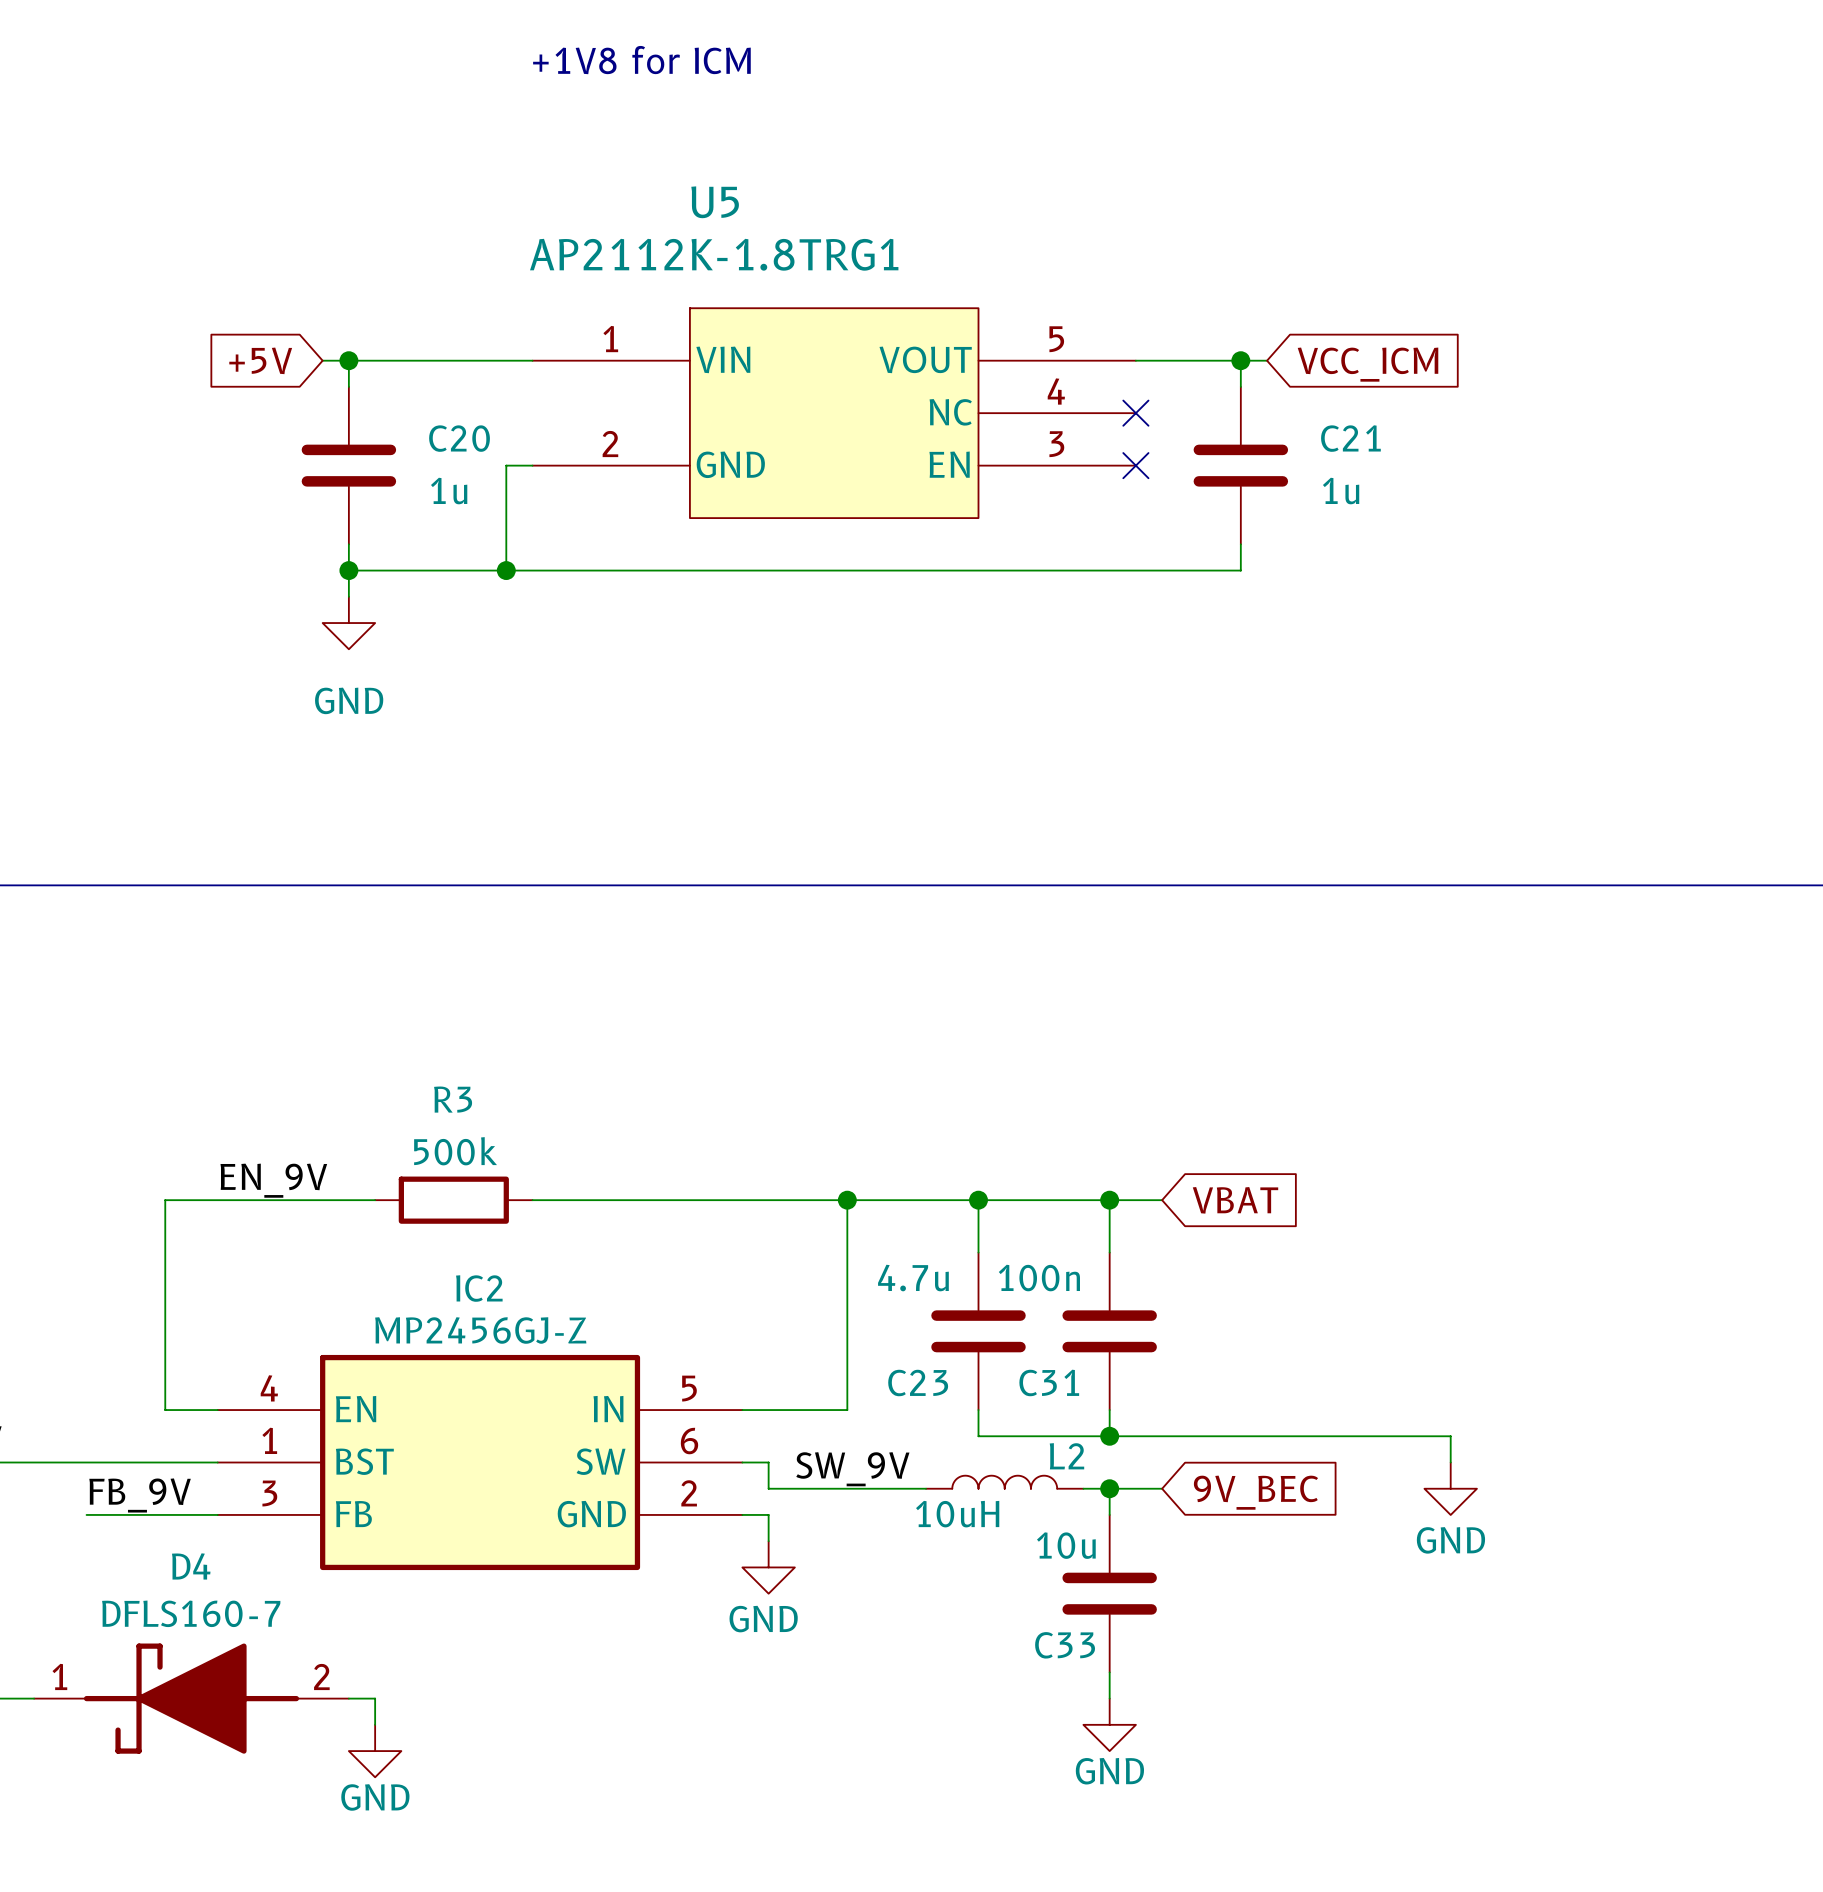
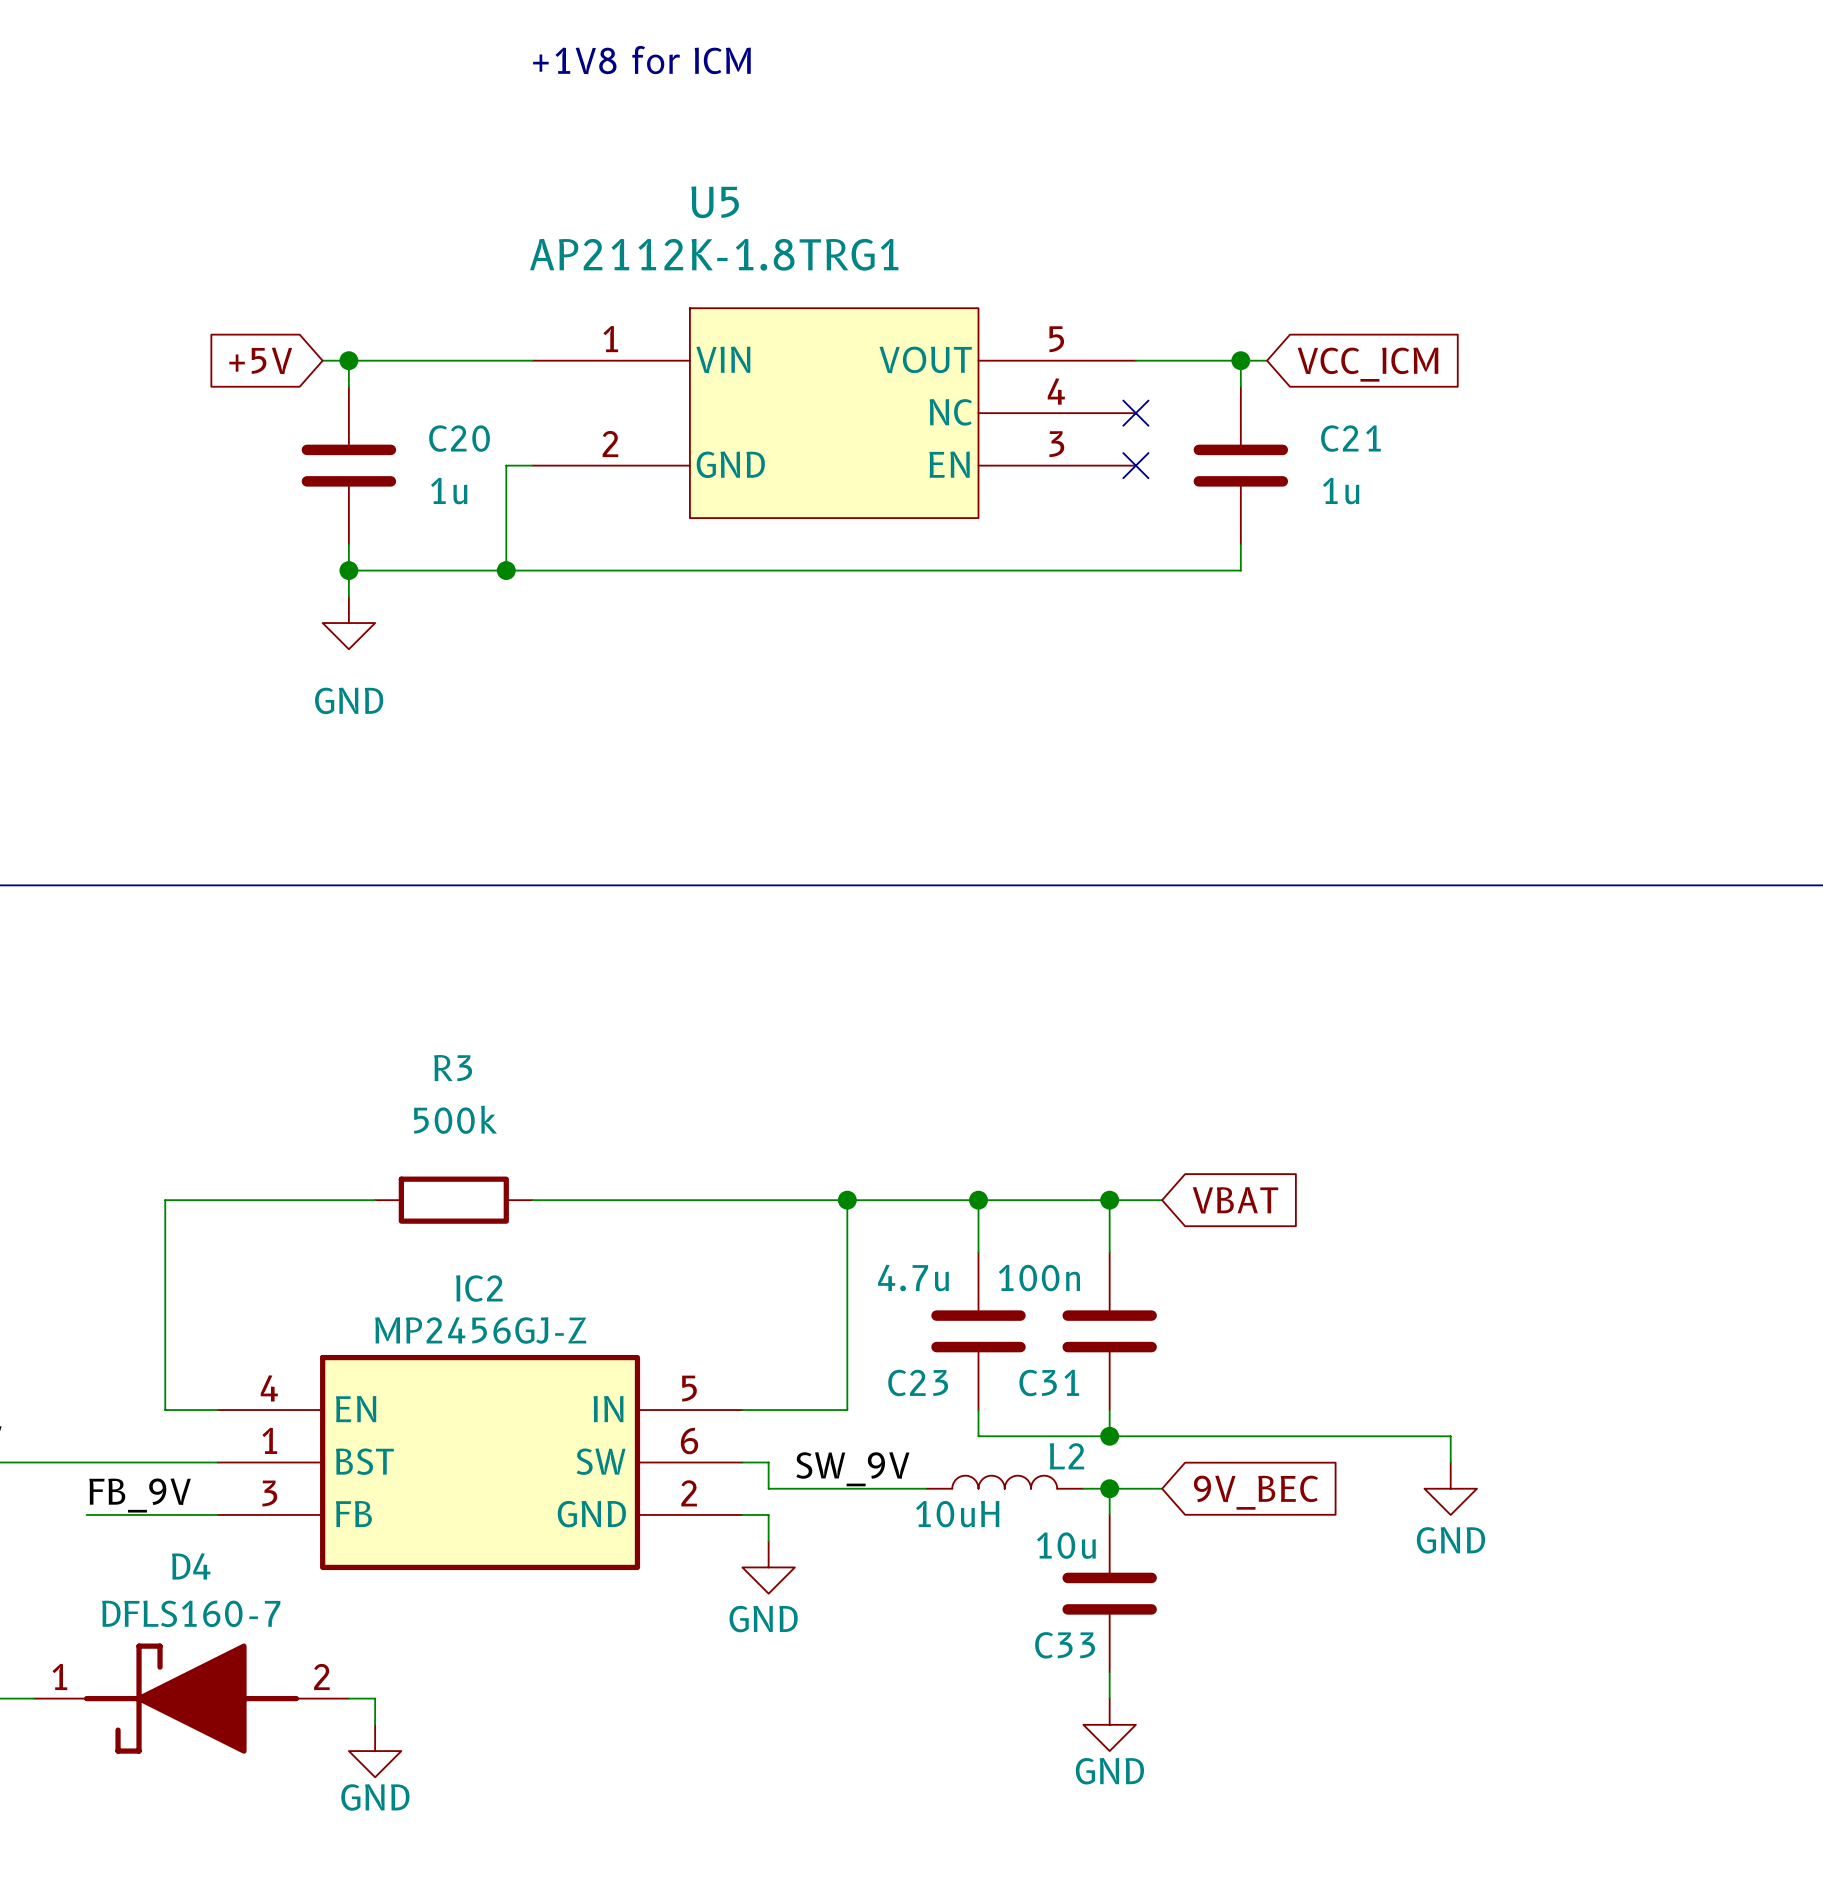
R3 name position: R3 (453, 1099) -> R3 (453, 1068)
R3 value position: 500k (455, 1151) -> 500k (455, 1119)
label: EN_9V (273, 1180) -> none

